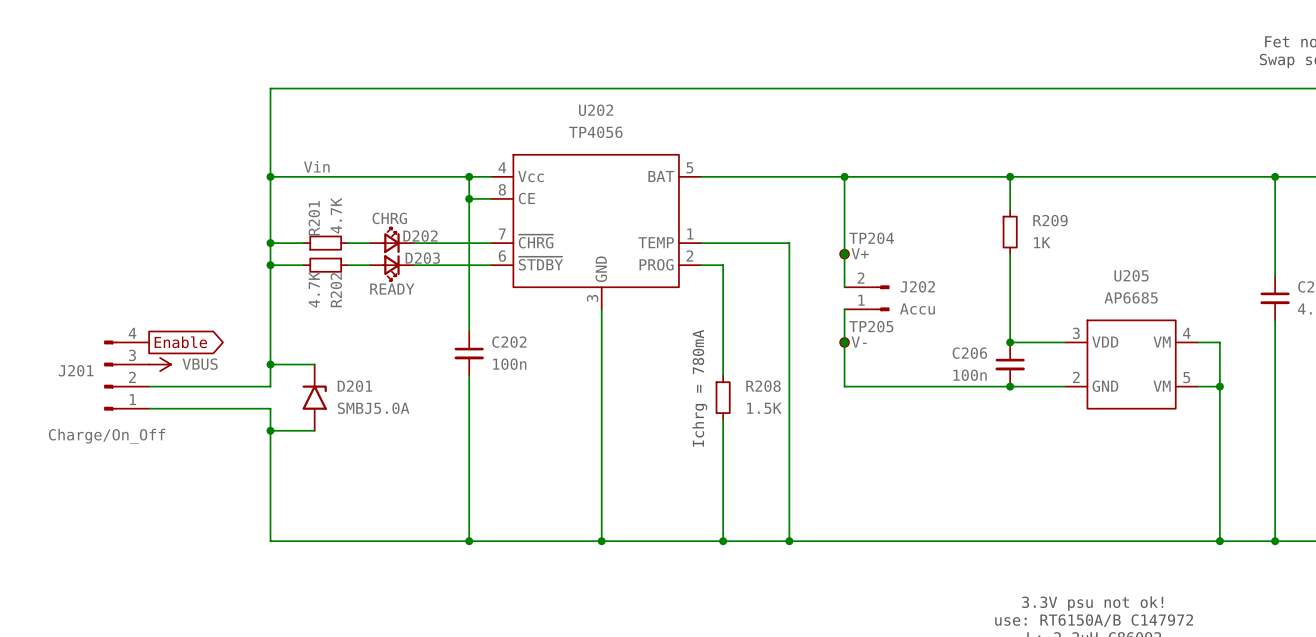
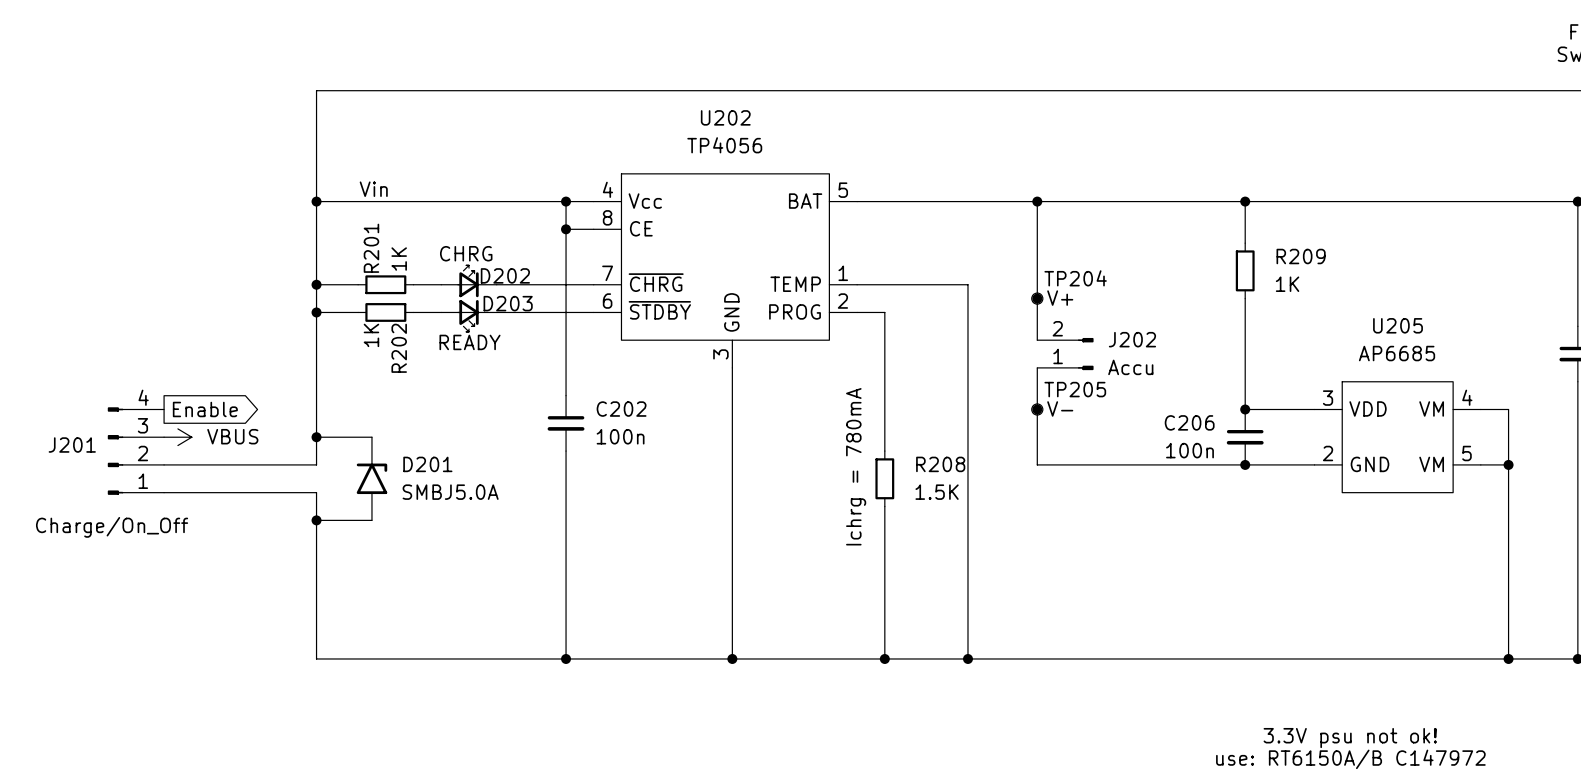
R201 value: 4.7K (336, 215) -> 1K (399, 259)
R202 value: 4.7K (314, 289) -> 1K (371, 335)

